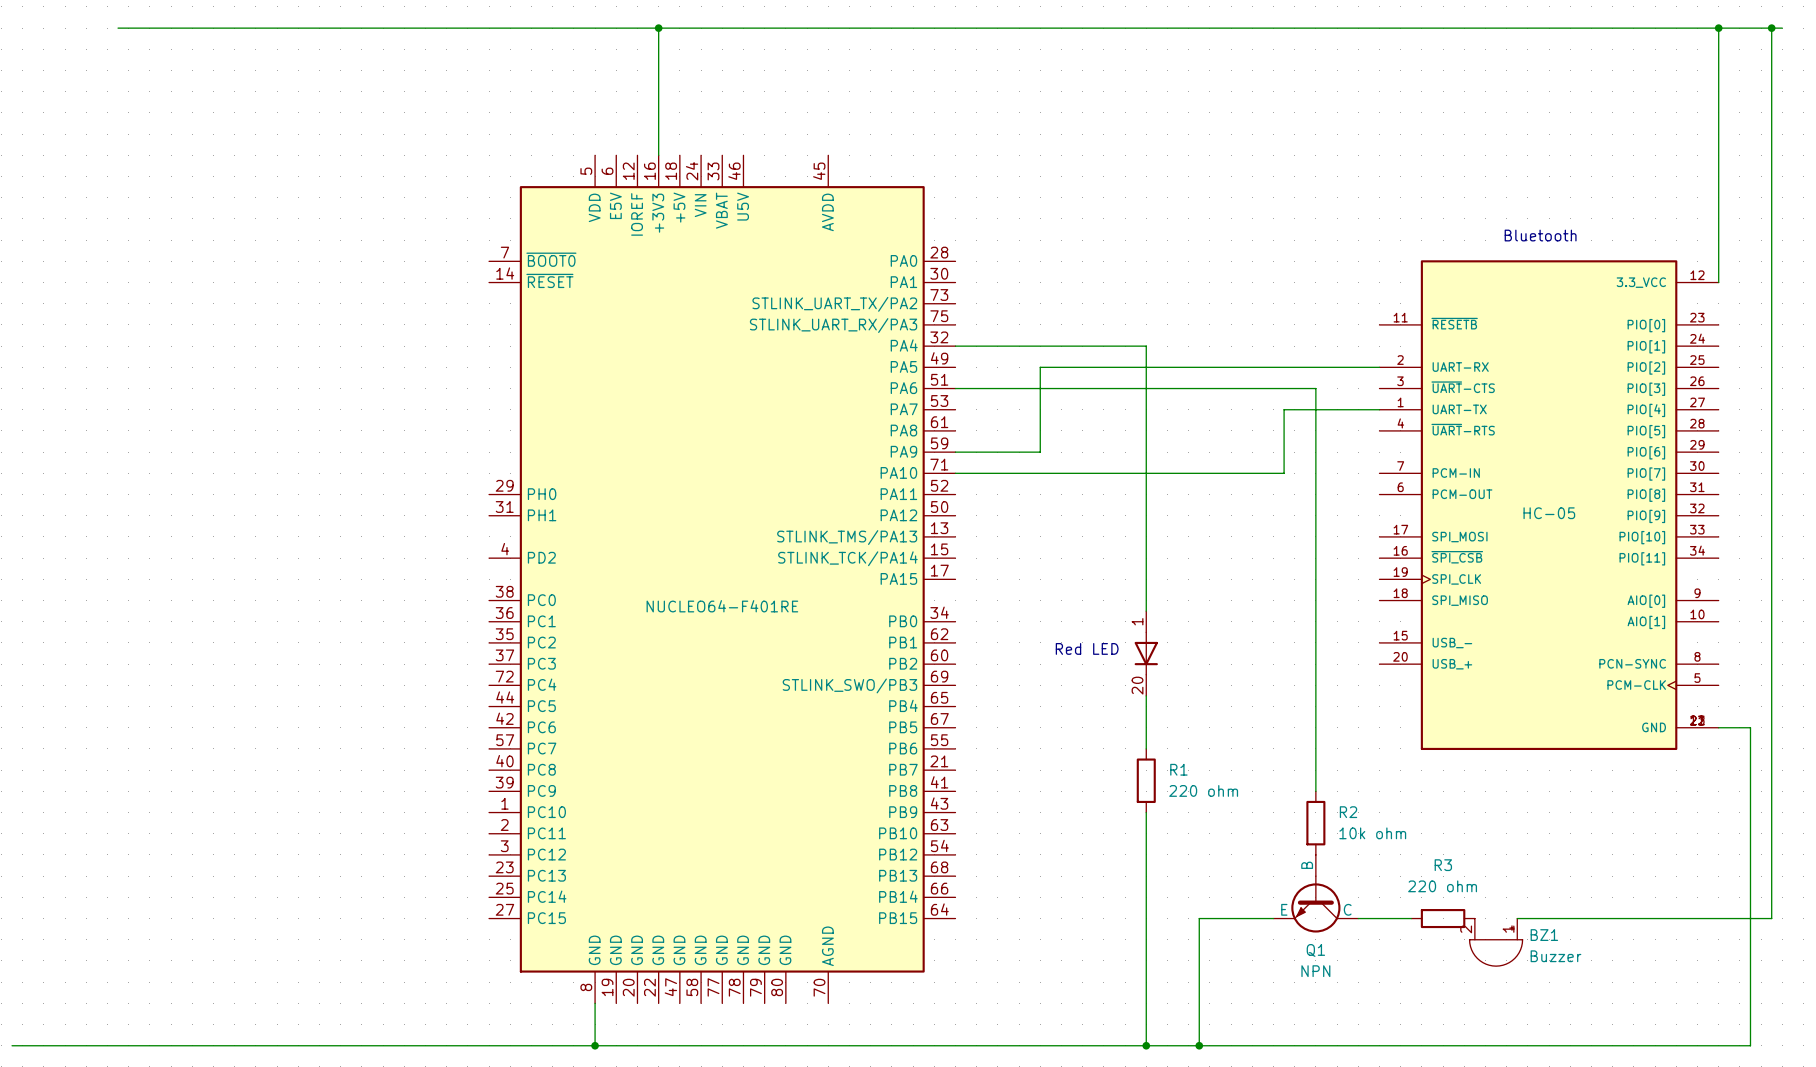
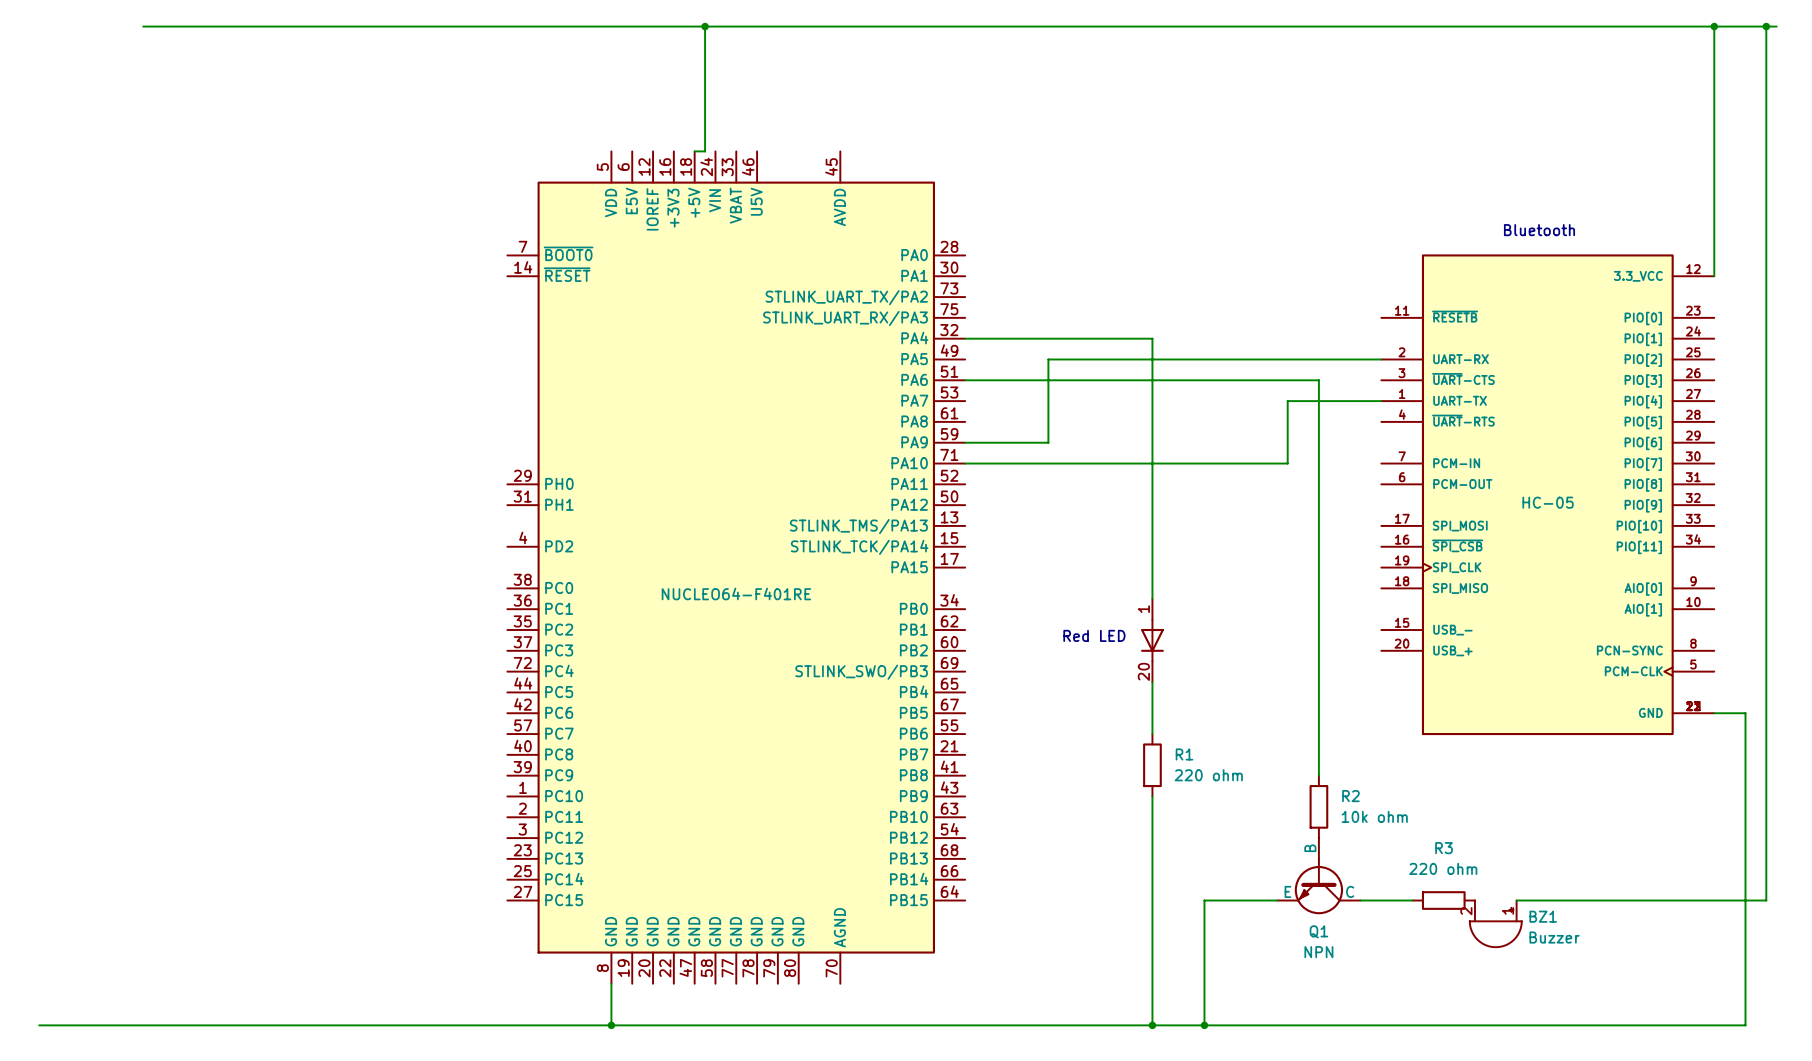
wire: (658, 28) (658, 155) -> none
junction position: (658, 28) -> (705, 26)
wire: none -> (705, 26) (705, 151) (694, 151)

